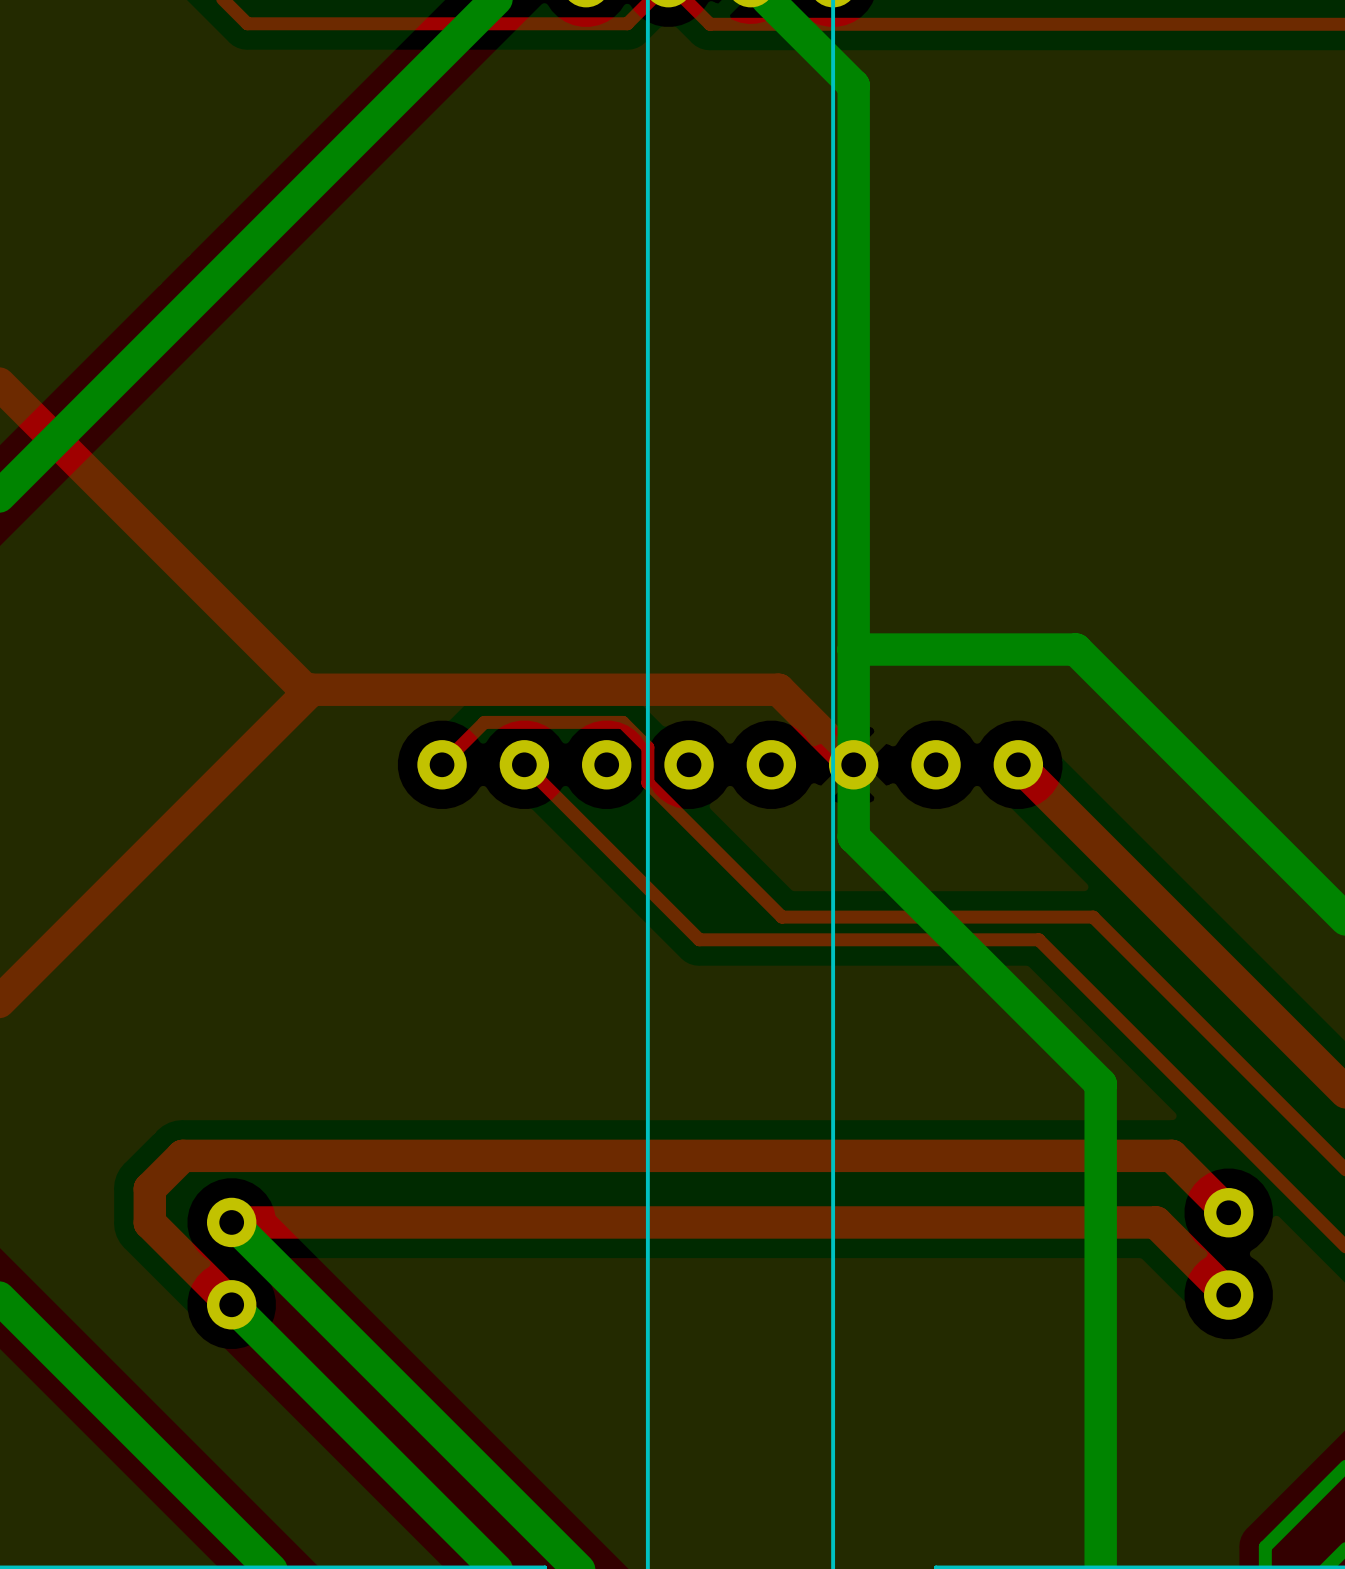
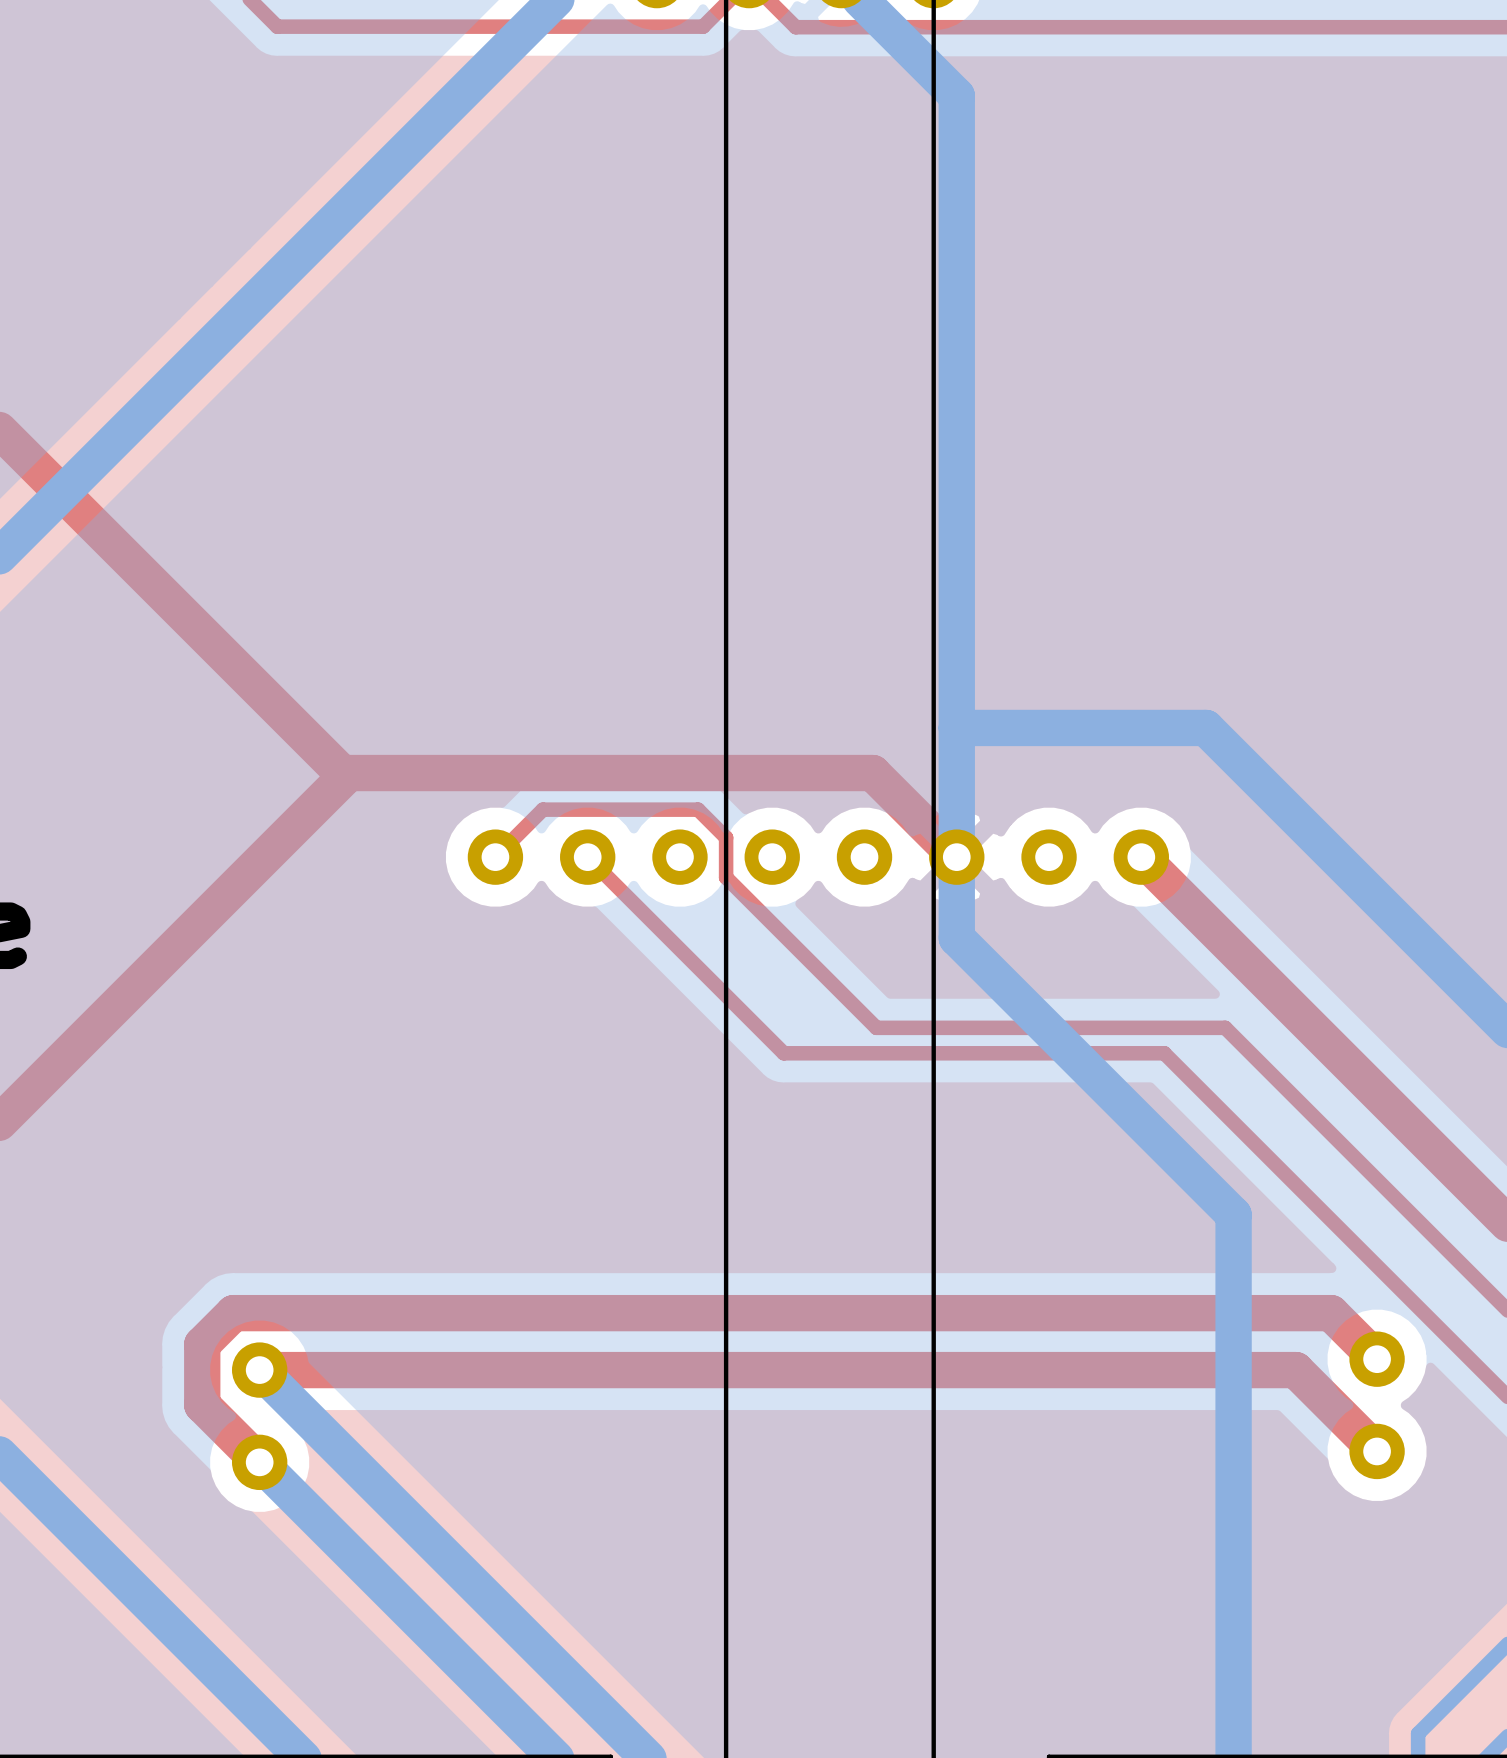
top track: (1187, 1171) (1171, 1155) (182, 1155) (149, 1188) (149, 1222) (180, 1253) -> (1331, 1313) (233, 1313) (202, 1344) (202, 1404)

